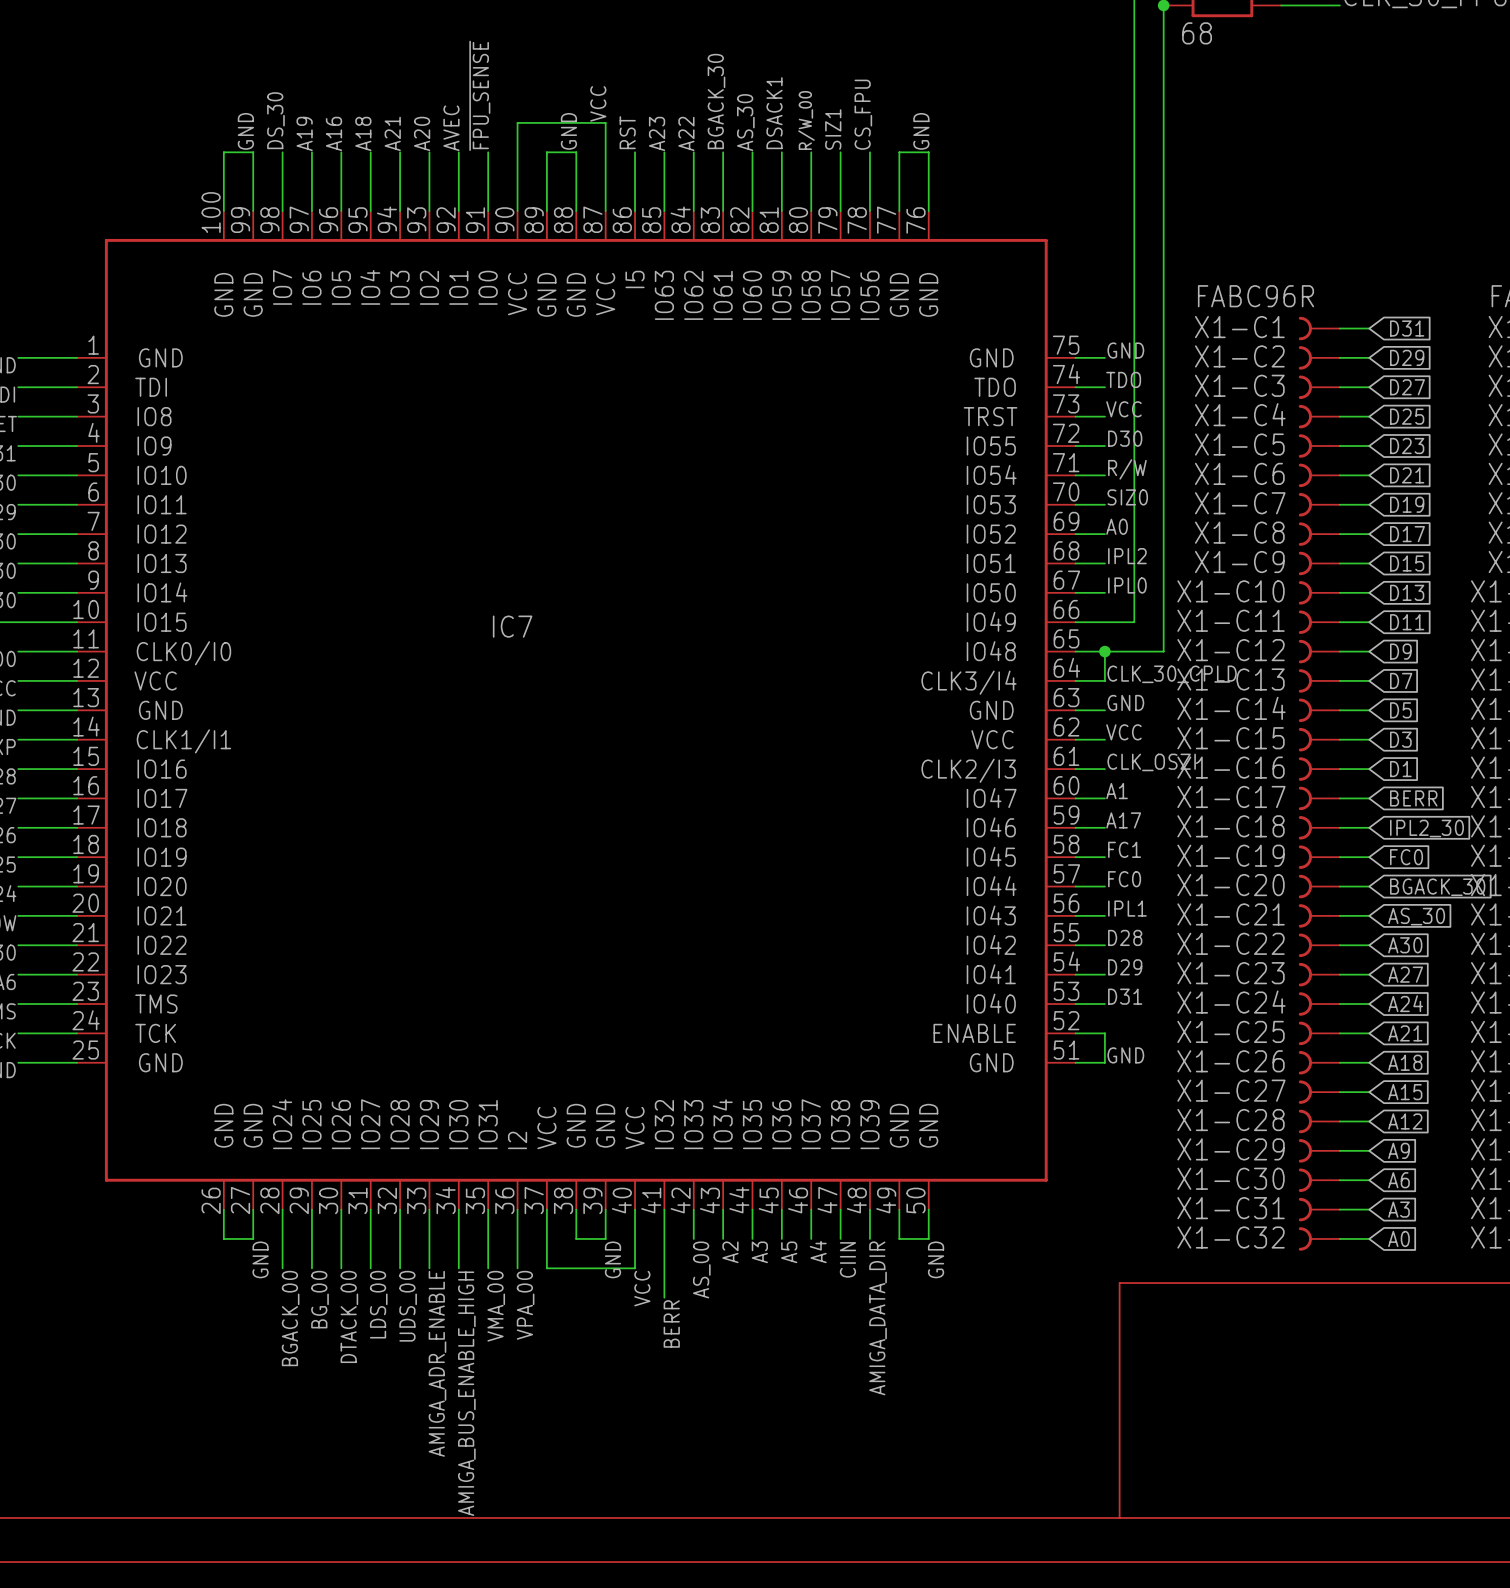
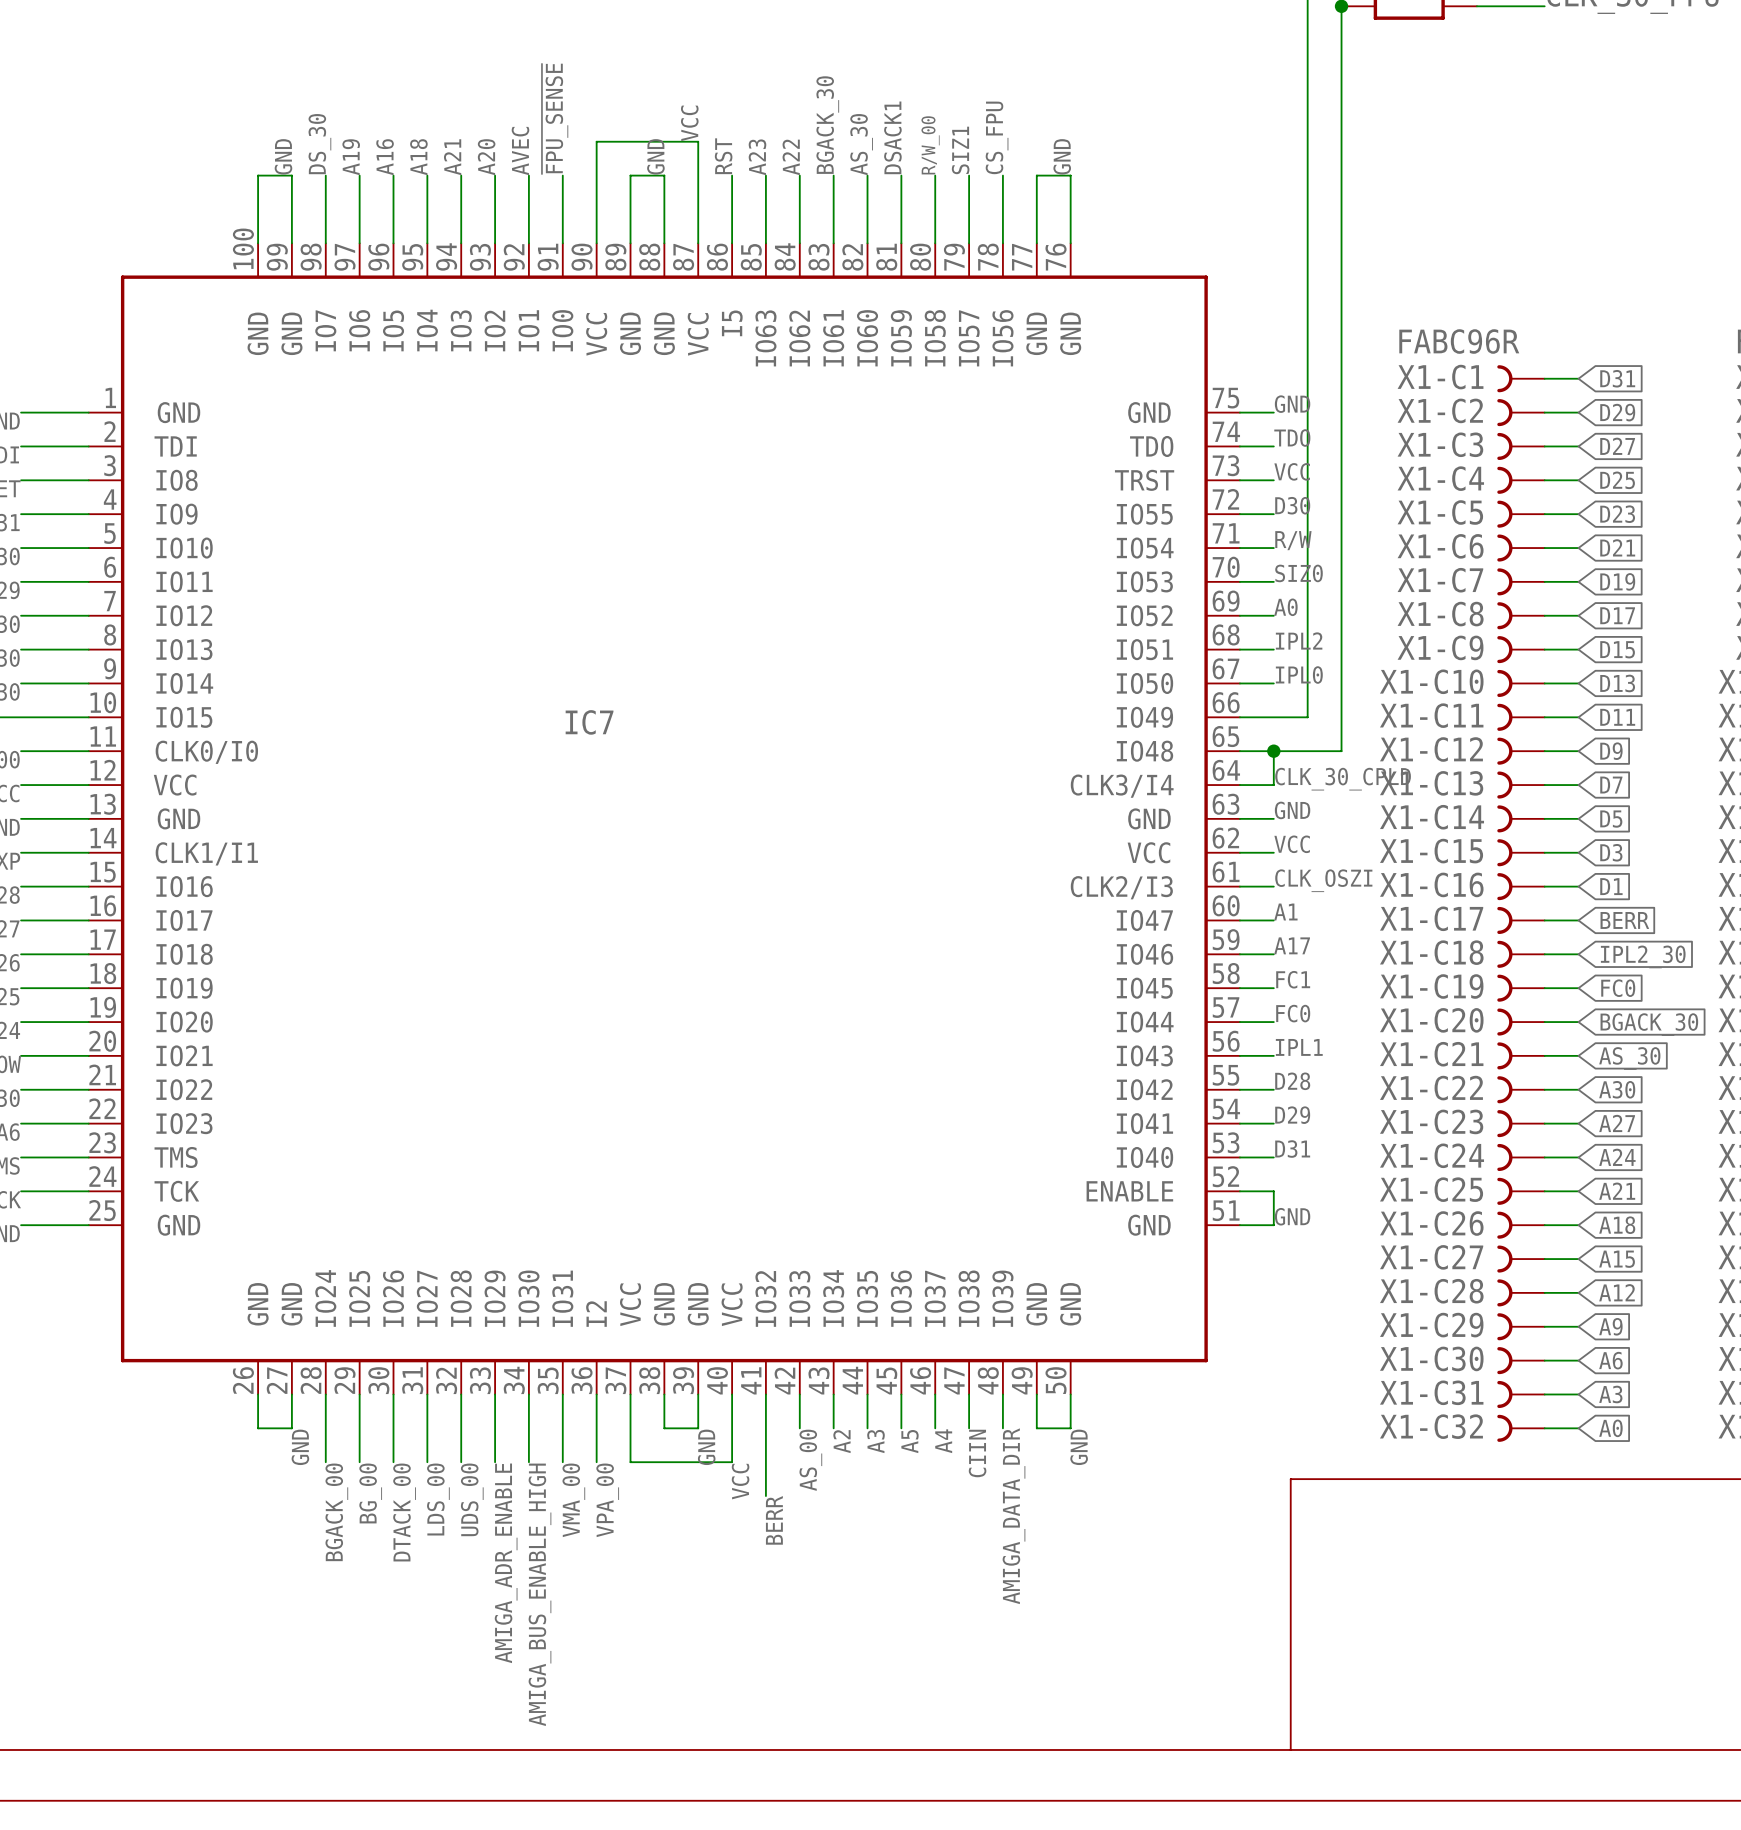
part value: 68 (1197, 33) -> none

